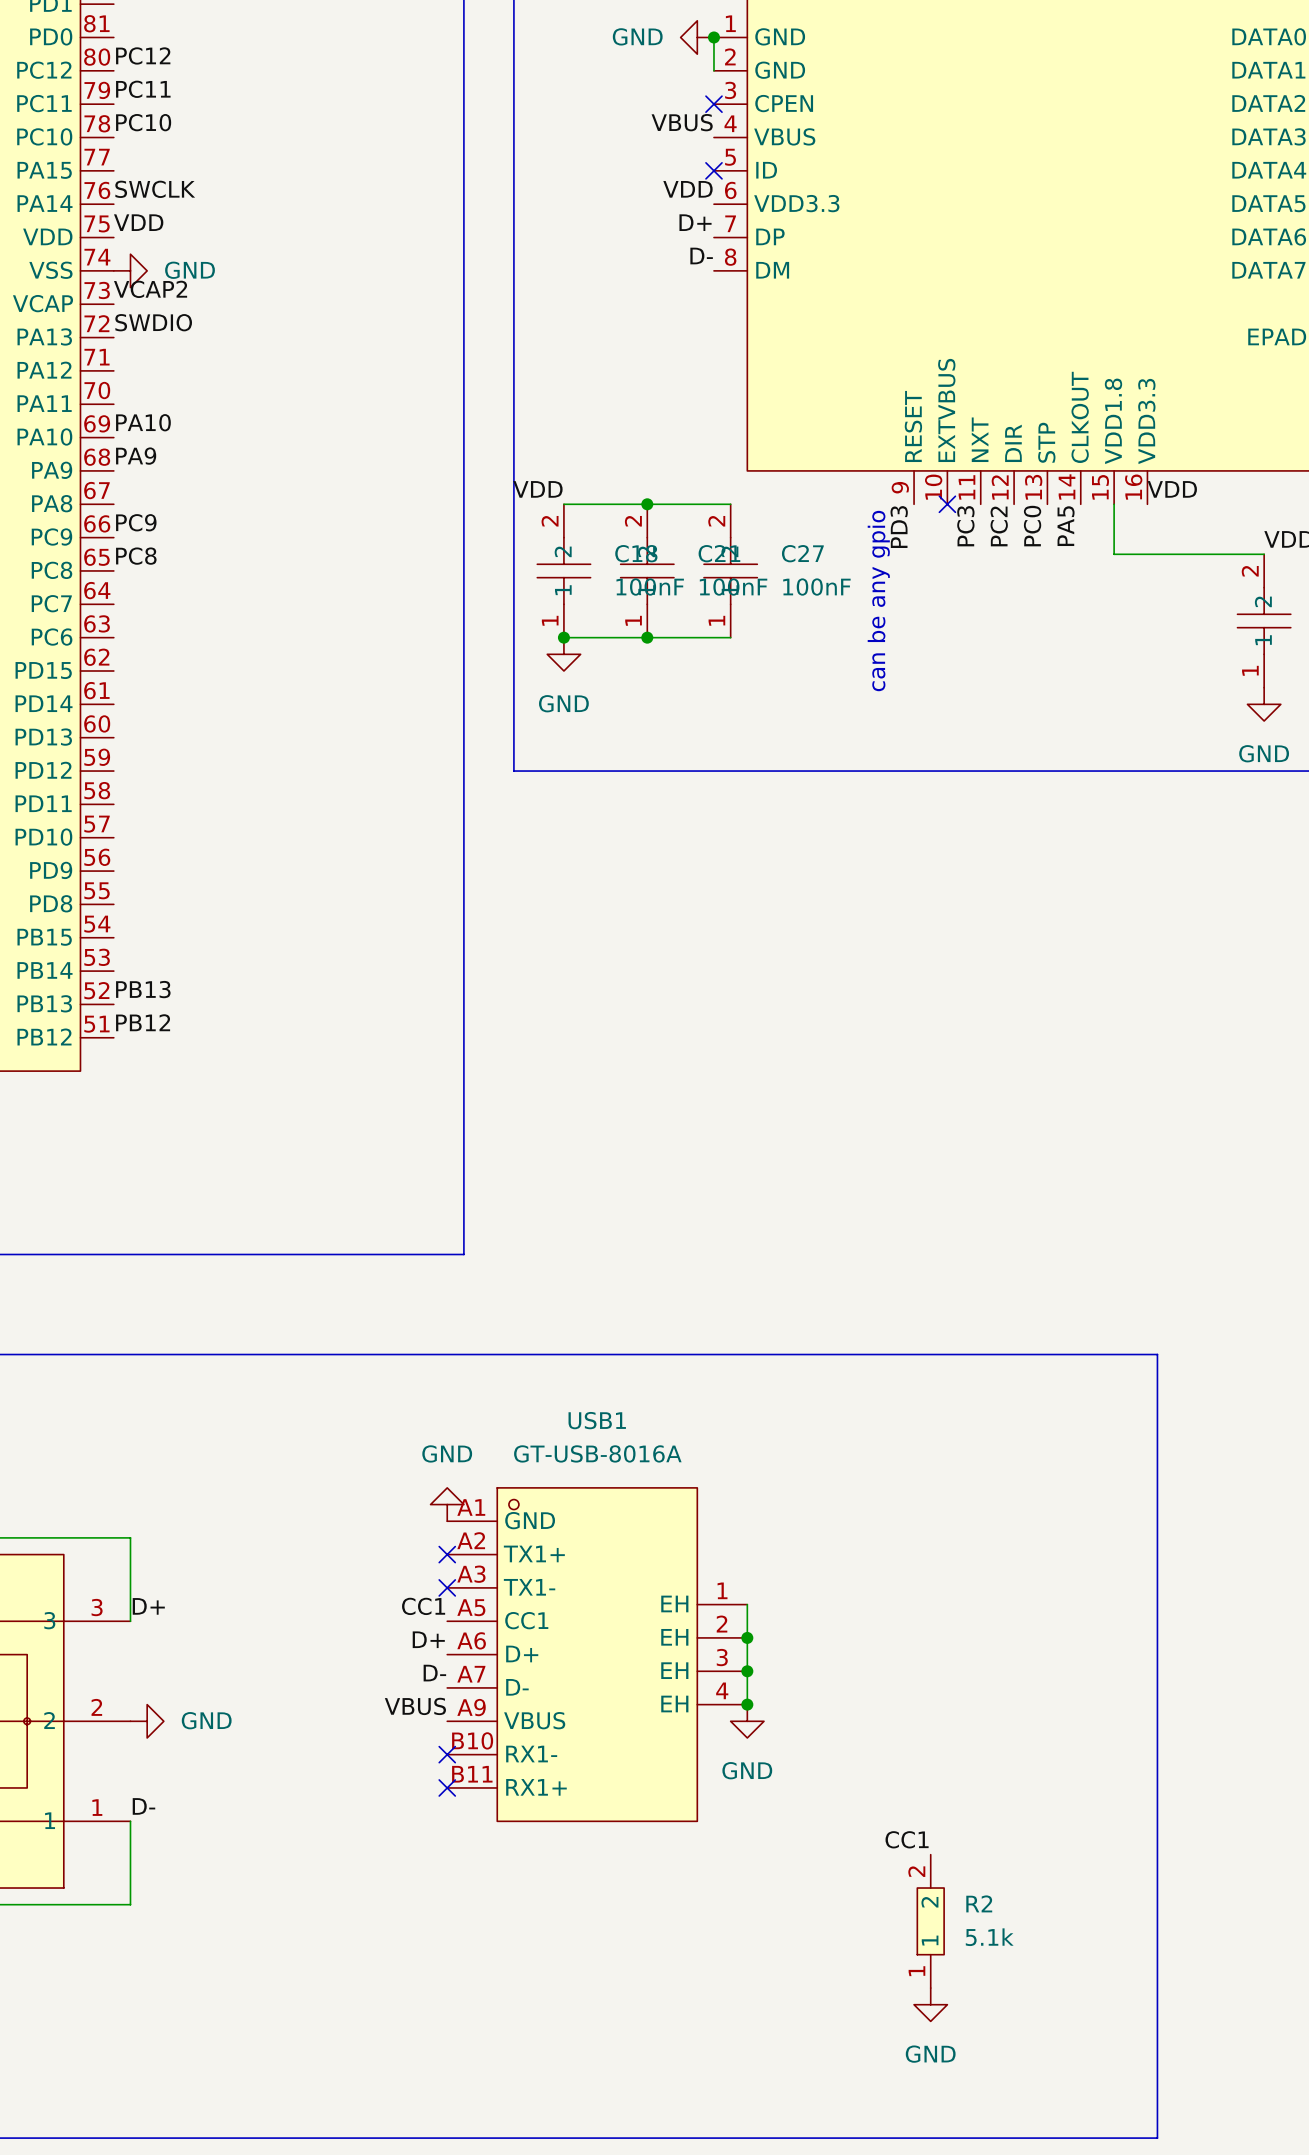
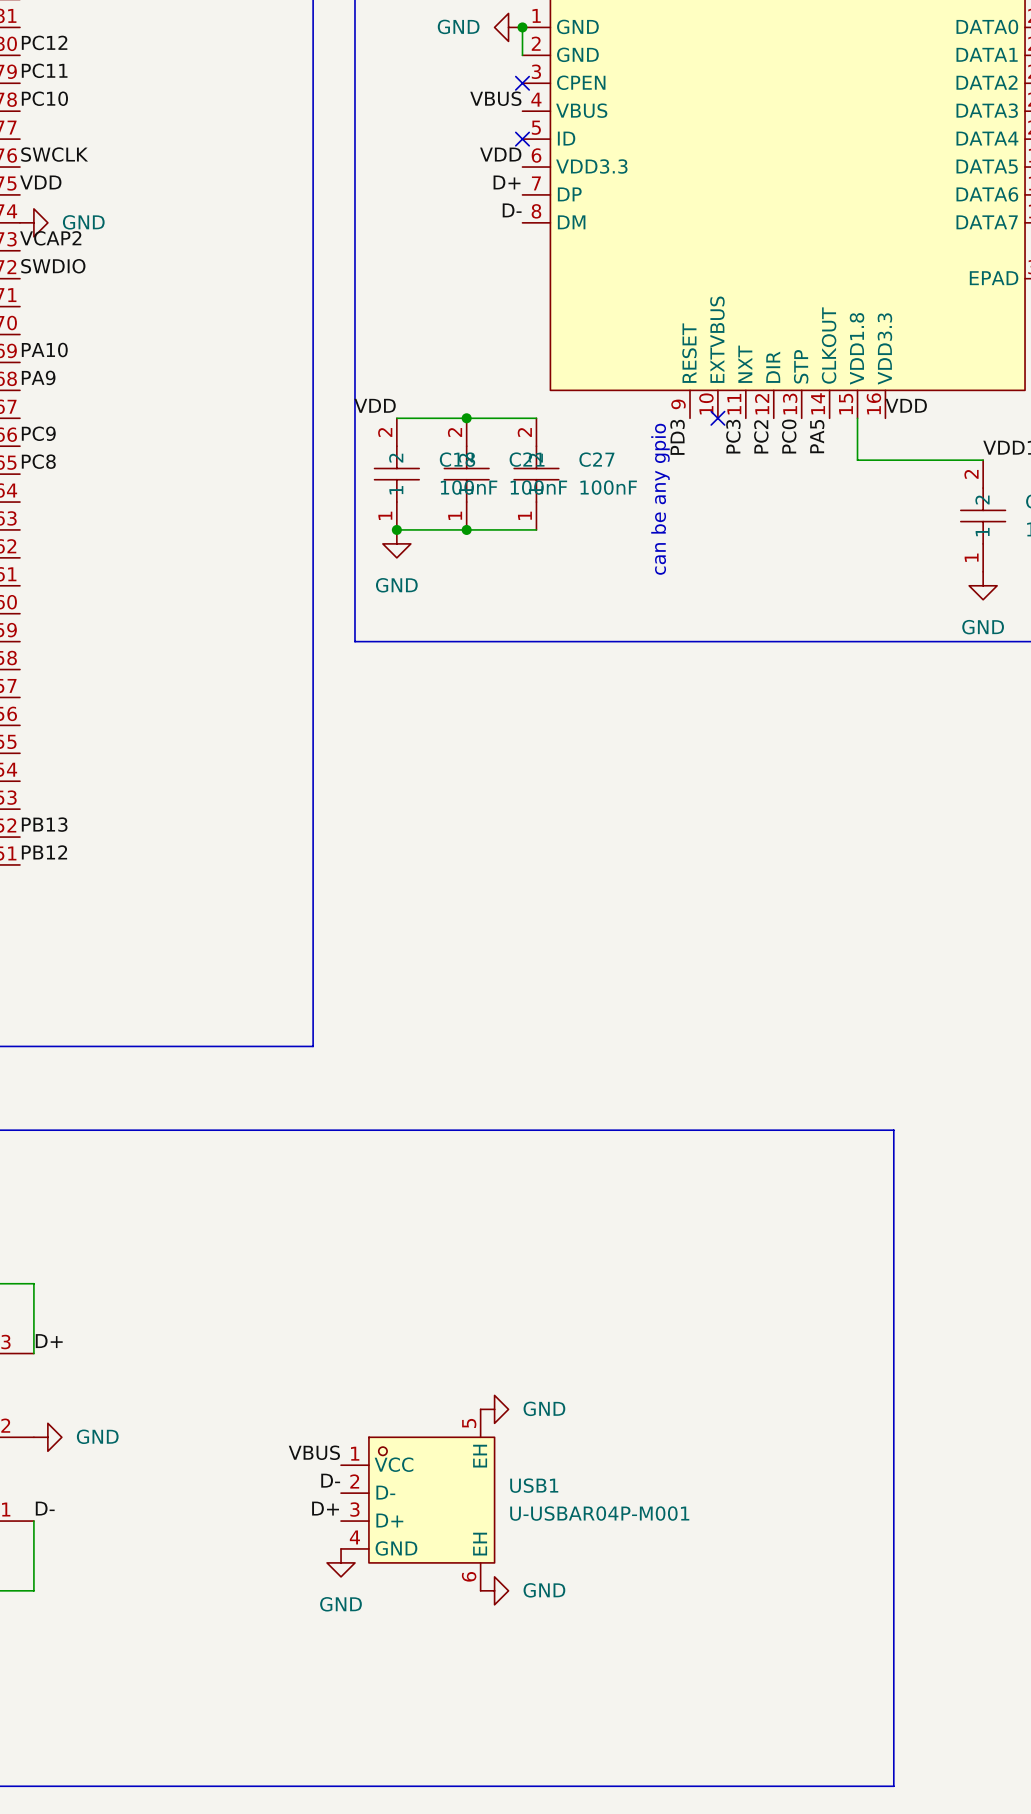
USB1 name position: USB1 (597, 1420) -> USB1 (534, 1485)
USB1 value: GT-USB-8016A (597, 1453) -> U-USBAR04P-M001 (599, 1513)
USB1 symbol: [447, 1487, 748, 1822] -> [341, 1409, 495, 1591]
power symbol: GND (447, 1504) -> none
no-connect mark: (447, 1554) -> none
no-connect mark: (447, 1587) -> none
wire: (747, 1604) (747, 1704) -> none
label: CC1 (423, 1606) -> none
junction: (747, 1637) -> none
label position: D+ (428, 1639) -> D+ (325, 1508)
junction: (747, 1671) -> none
label position: D- (434, 1673) -> D- (330, 1480)
junction: (747, 1704) -> none
label position: VBUS (415, 1706) -> VBUS (314, 1452)
power symbol rotation: 0° (747, 1721) -> 90° counterclockwise (494, 1409)
power symbol position: GND (747, 1721) -> GND (494, 1409)
no-connect mark: (447, 1754) -> none
no-connect mark: (447, 1787) -> none
label: CC1 (907, 1839) -> none
power symbol: none -> GND (341, 1562)
power symbol: none -> GND (494, 1590)
R2: 5.1k (930, 1921) -> none
power symbol: GND (930, 2004) -> none

